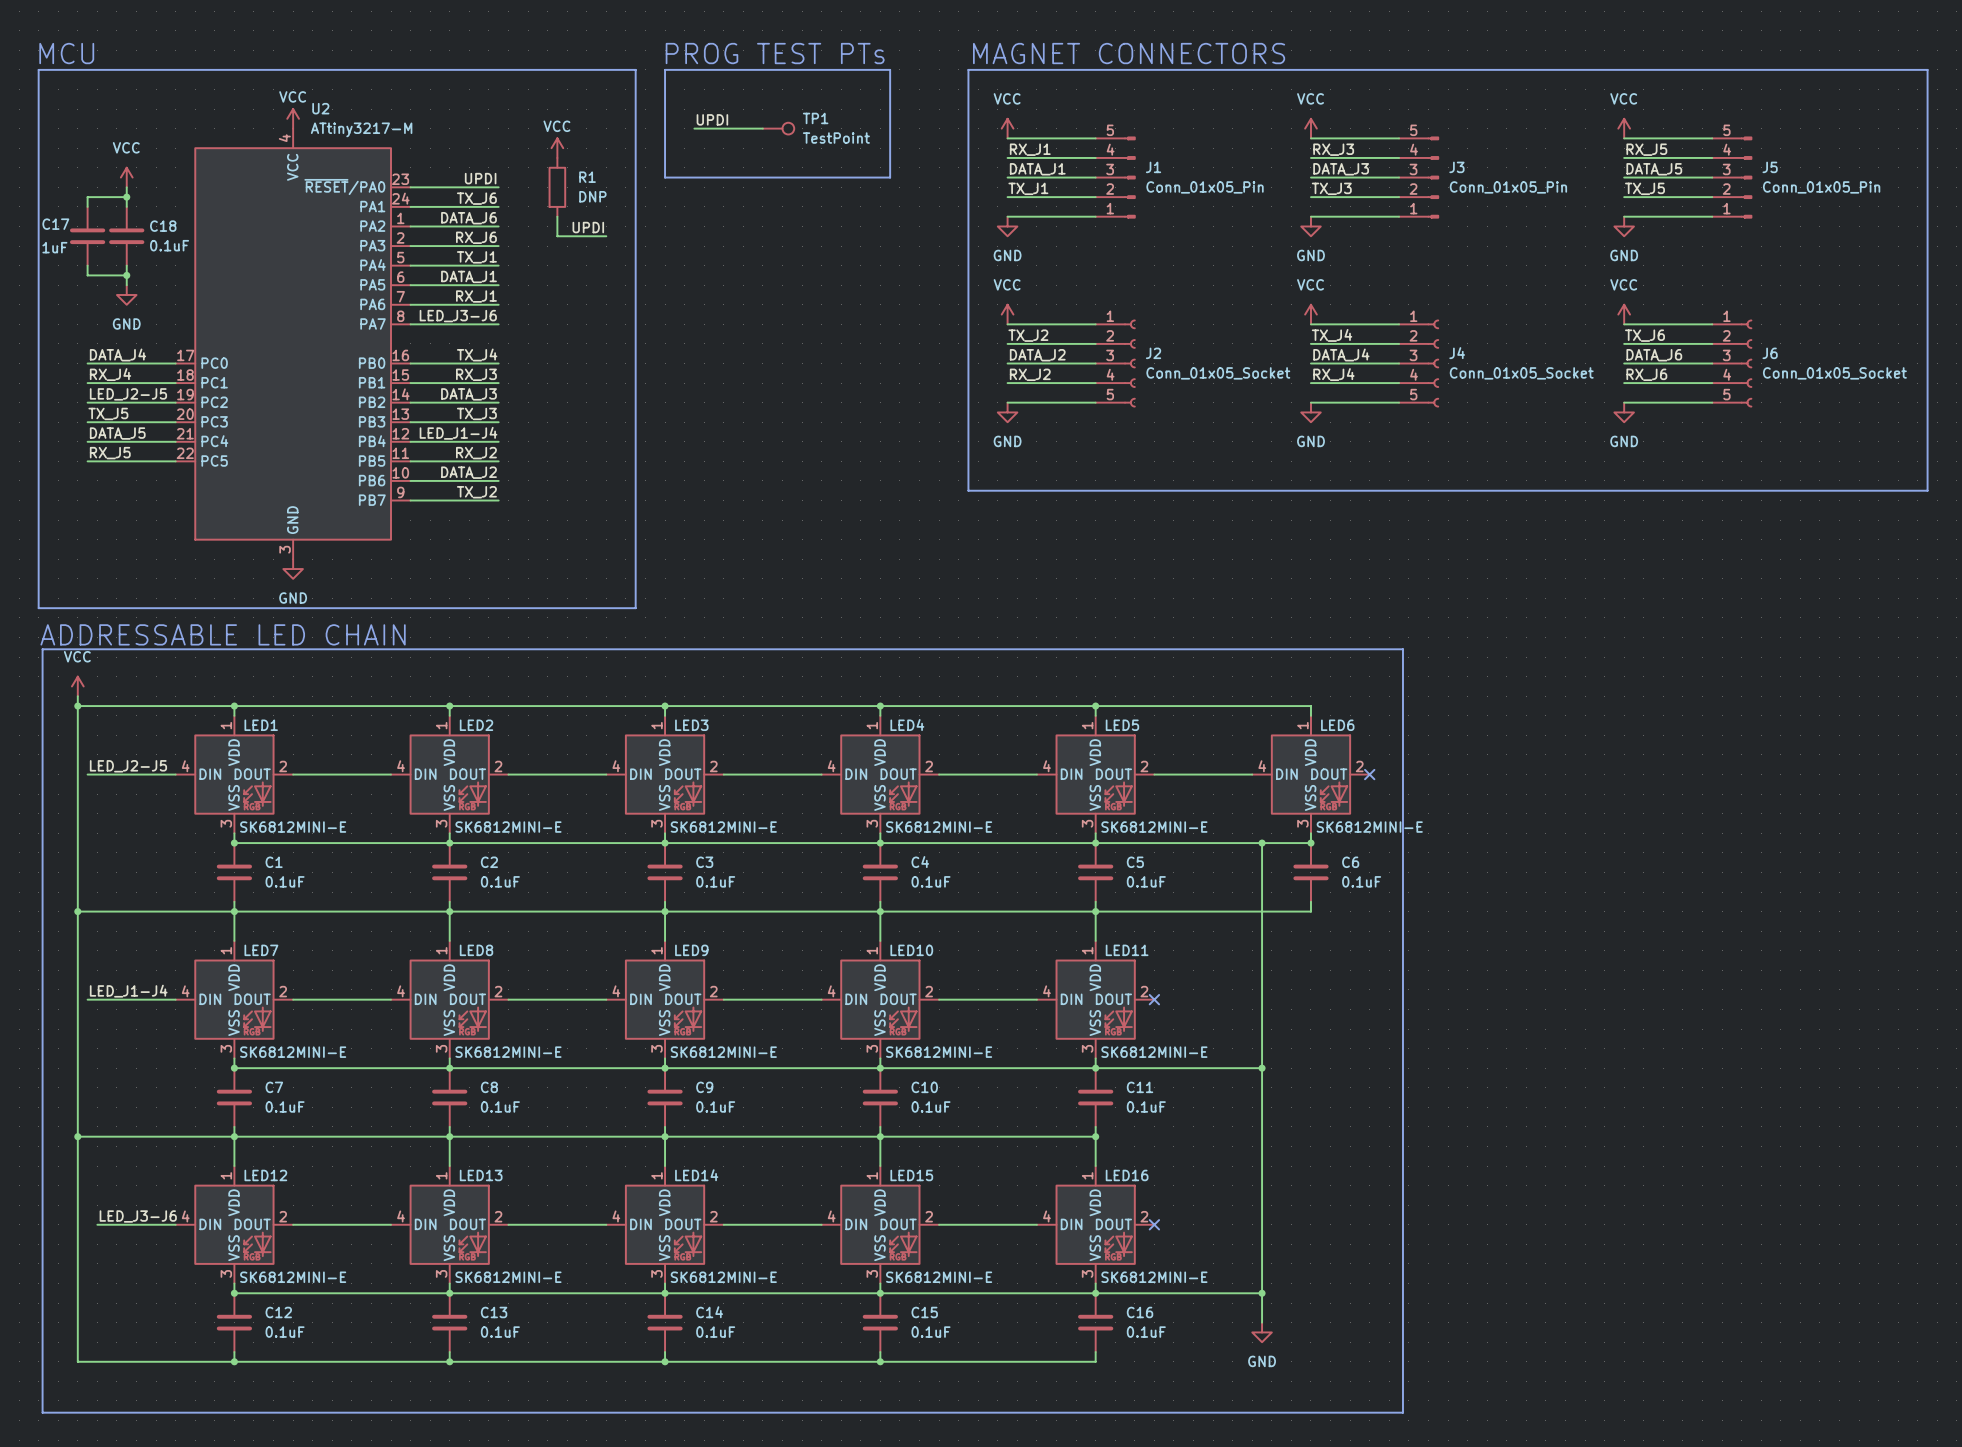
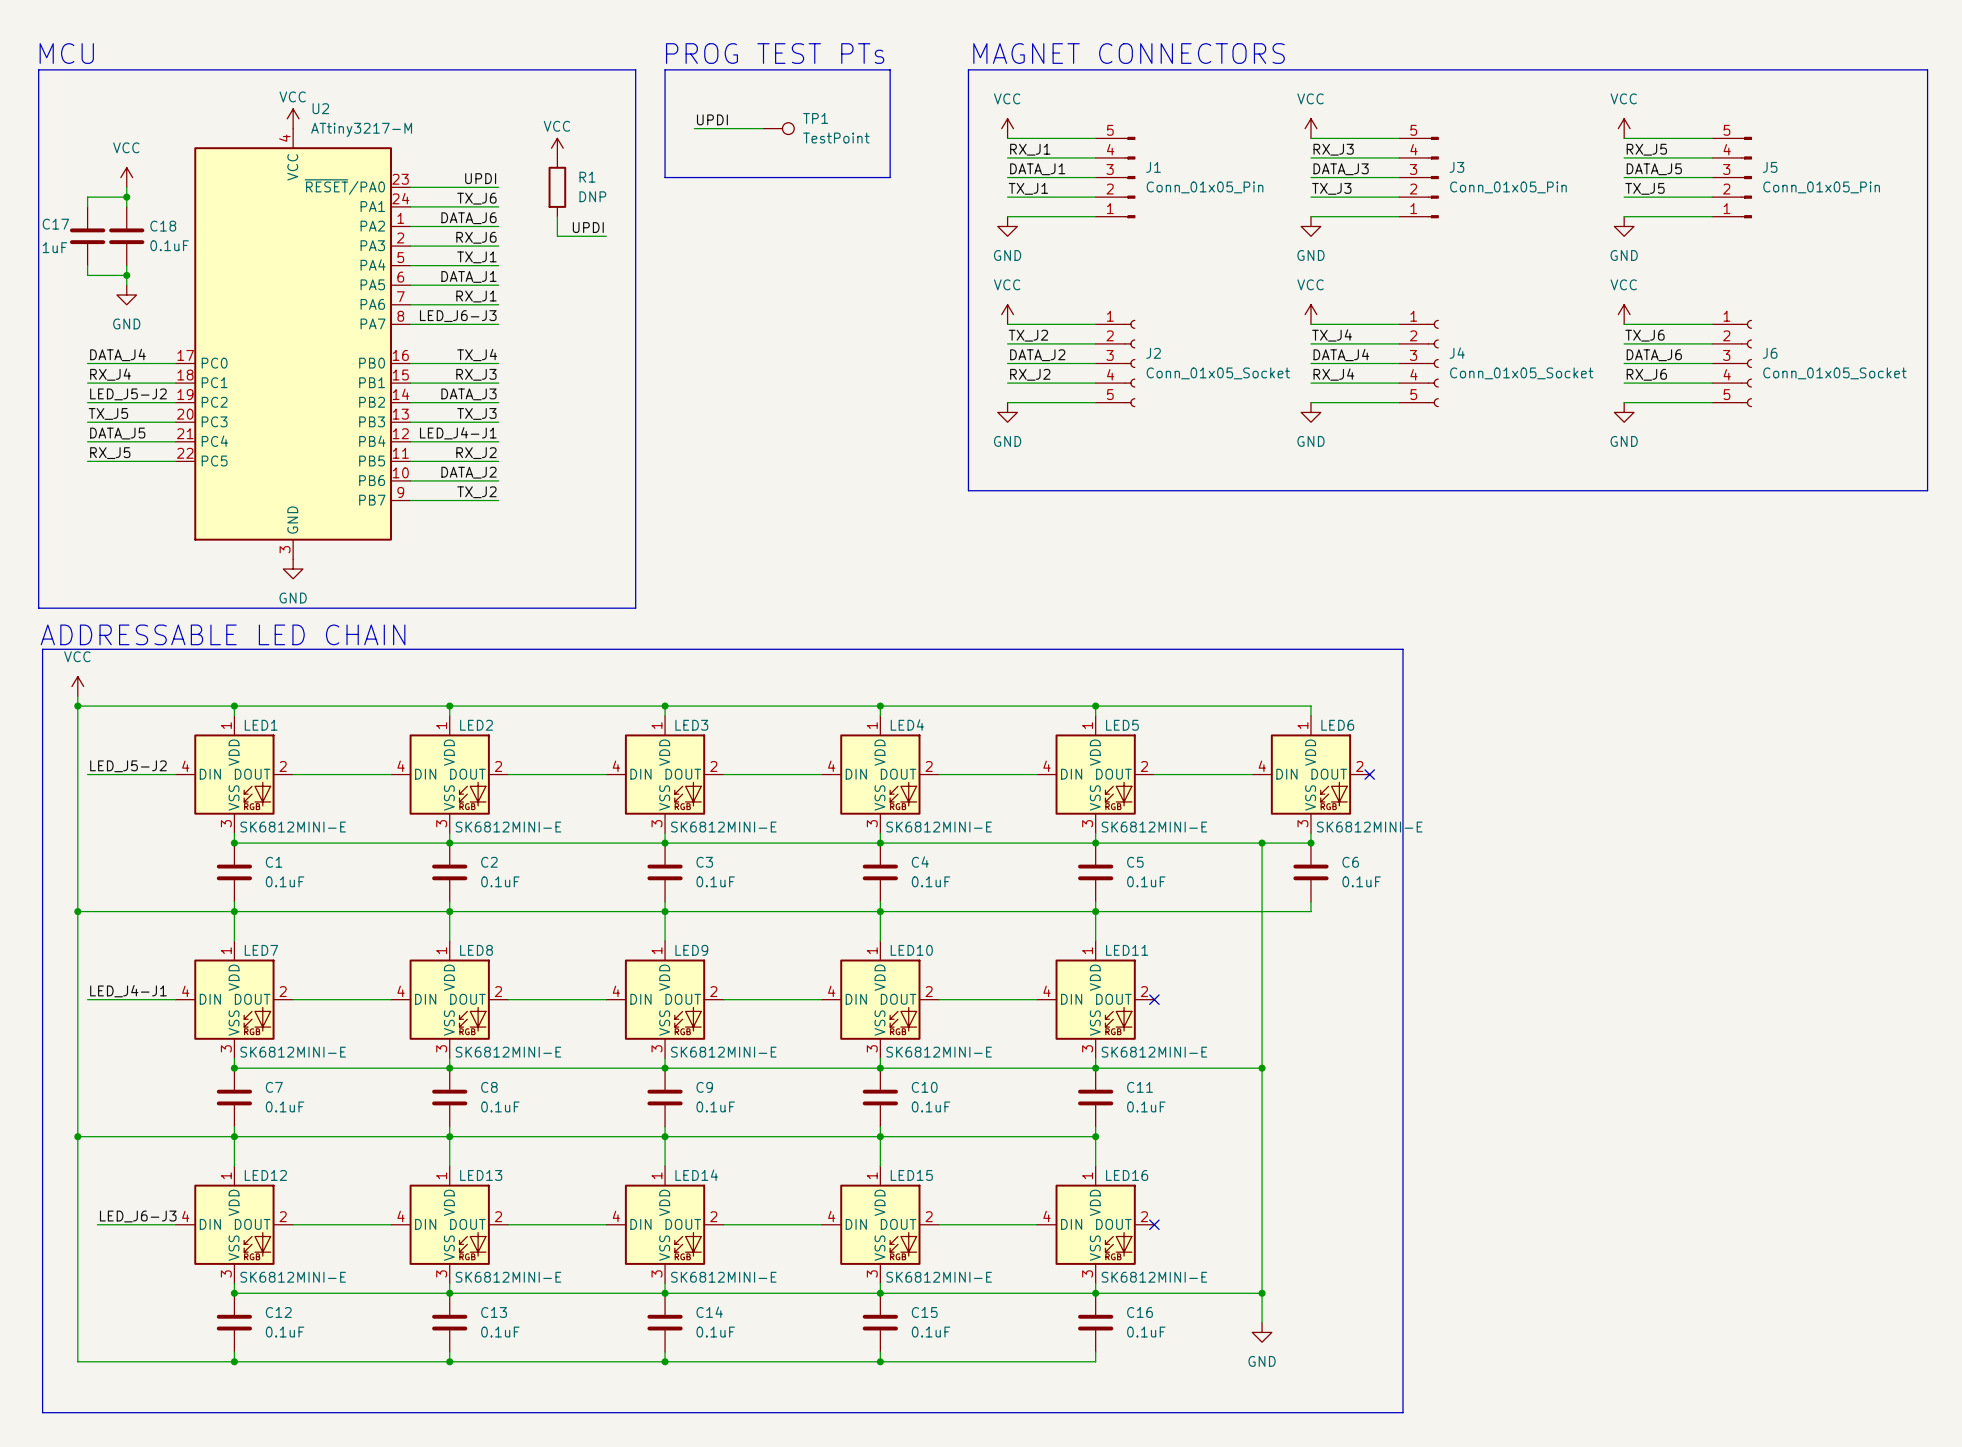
label: LED_J3-J6 (458, 316) -> LED_J6-J3 (458, 316)
label: LED_J2-J5 (128, 394) -> LED_J5-J2 (128, 394)
label: LED_J1-J4 (458, 433) -> LED_J4-J1 (458, 433)
label: LED_J2-J5 (128, 766) -> LED_J5-J2 (128, 766)
label: LED_J1-J4 (128, 991) -> LED_J4-J1 (128, 991)
label: LED_J3-J6 (138, 1216) -> LED_J6-J3 (138, 1216)

